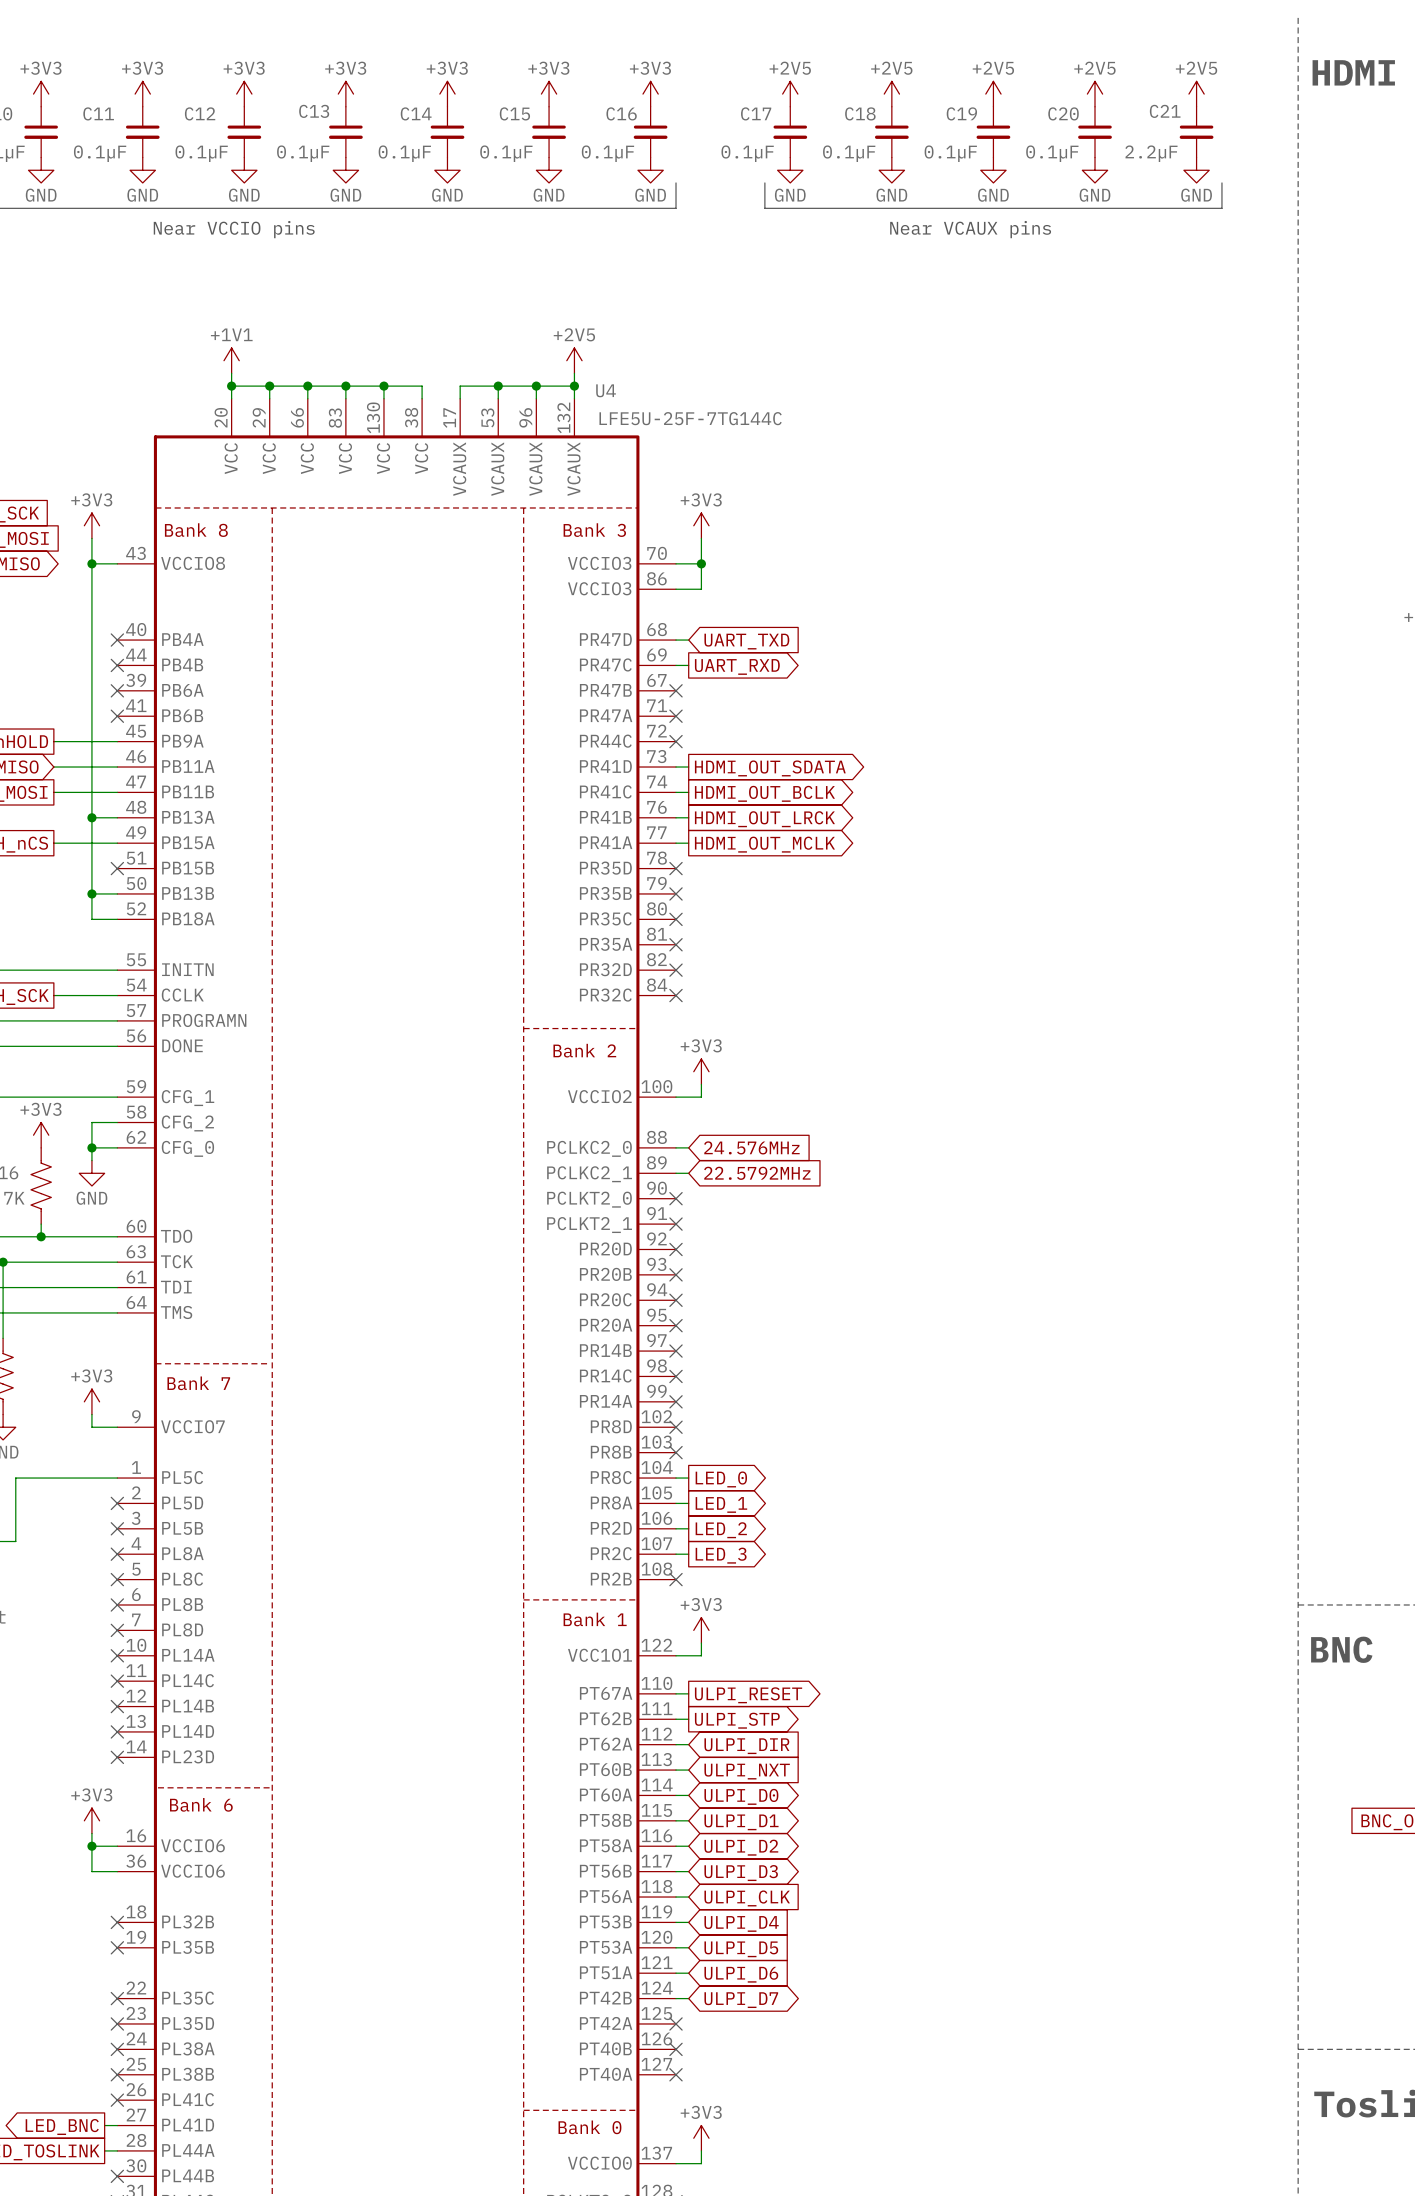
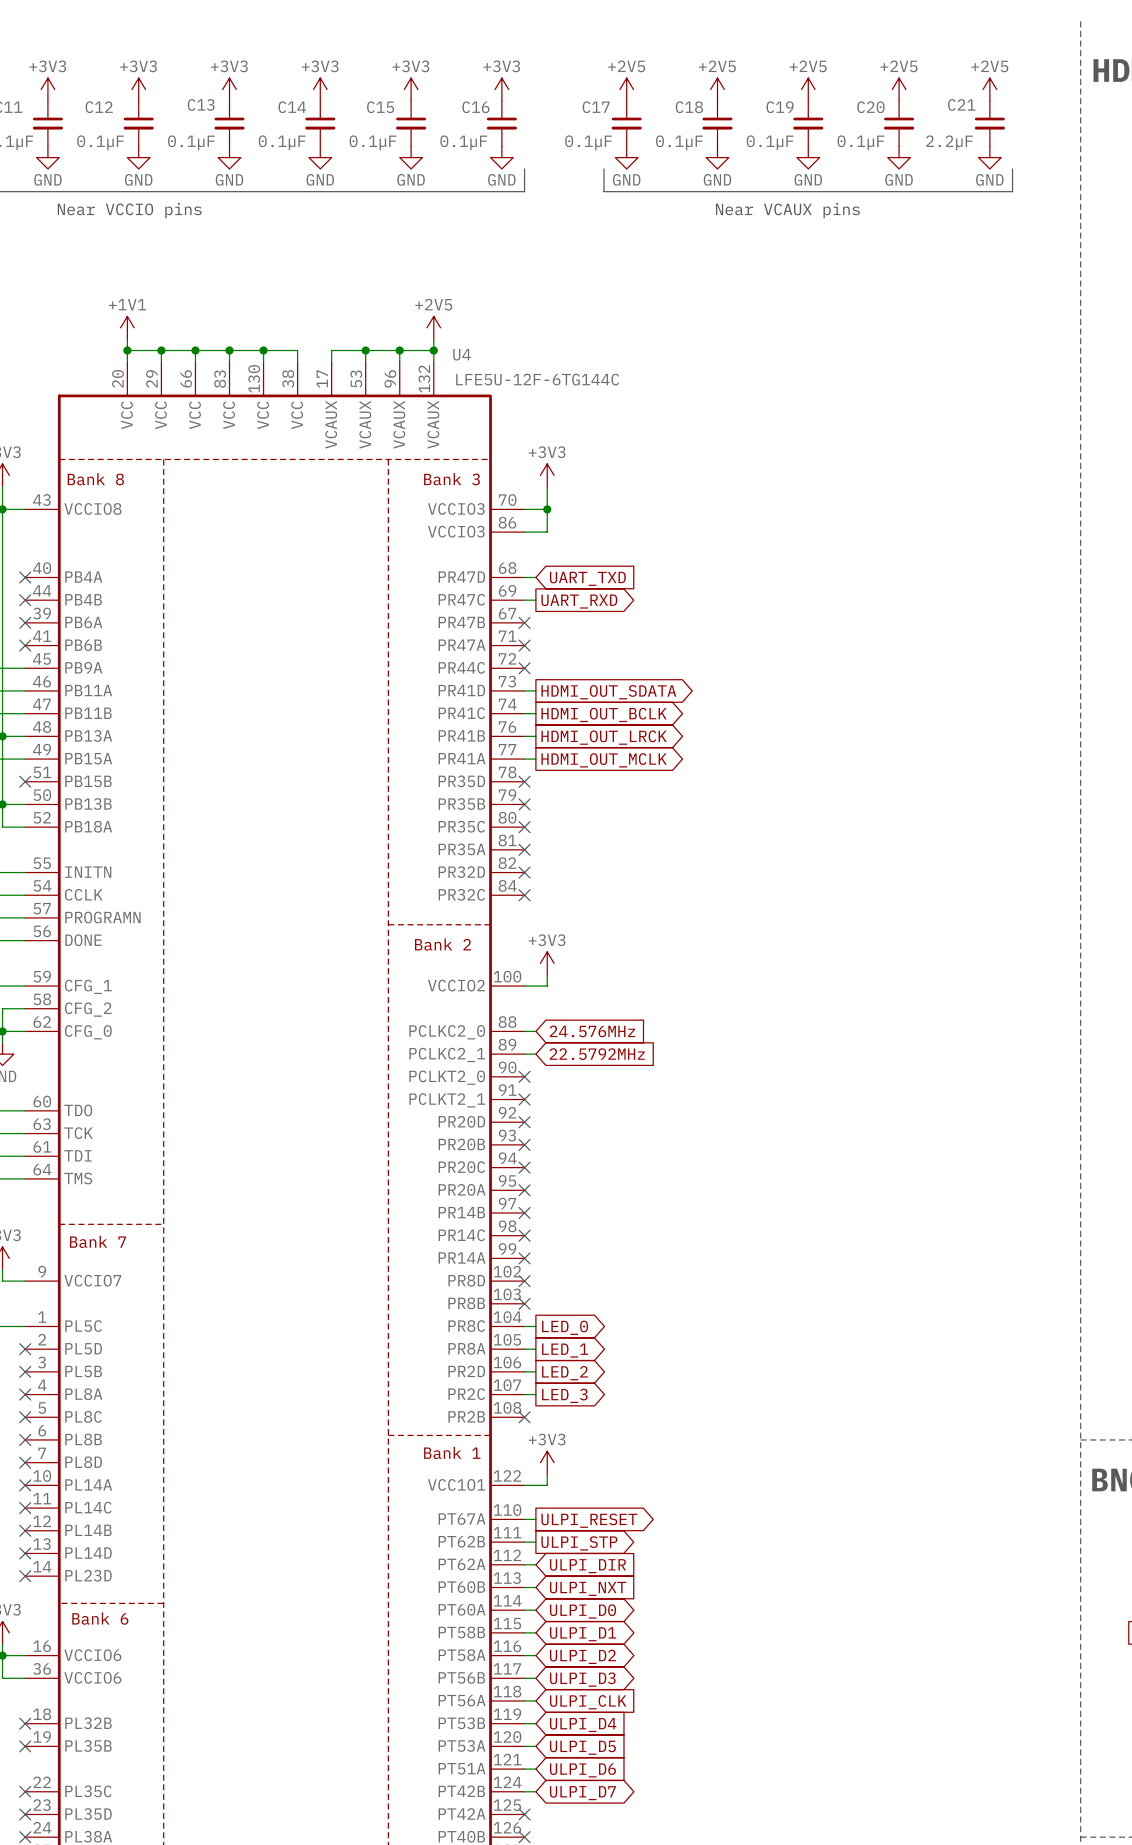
U4 value: LFE5U-25F-7TG144C (690, 418) -> LFE5U-12F-6TG144C (537, 379)

